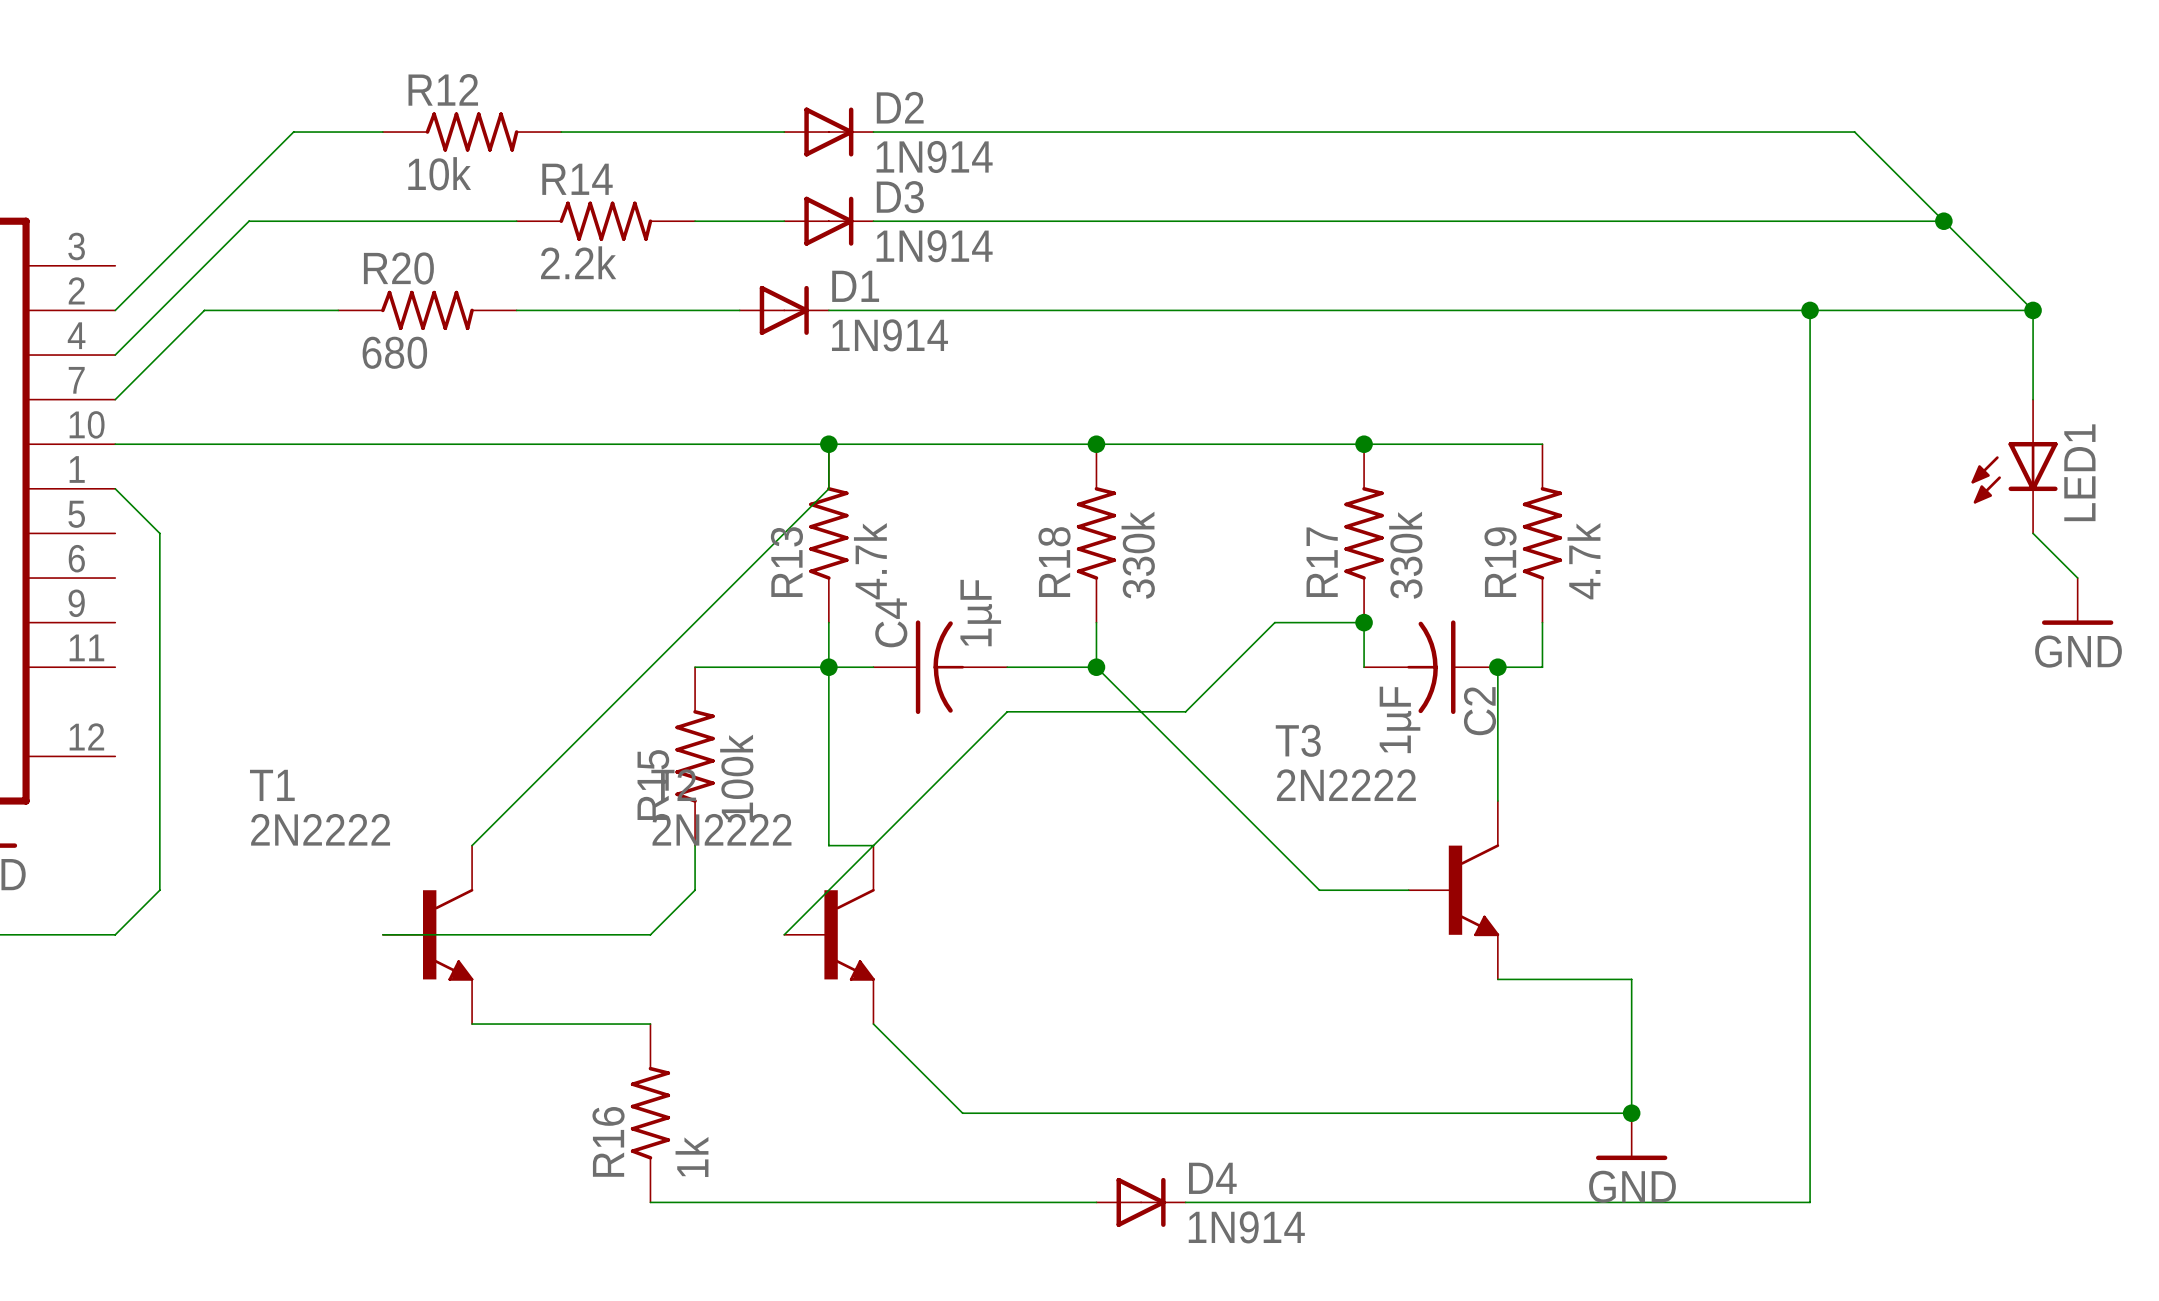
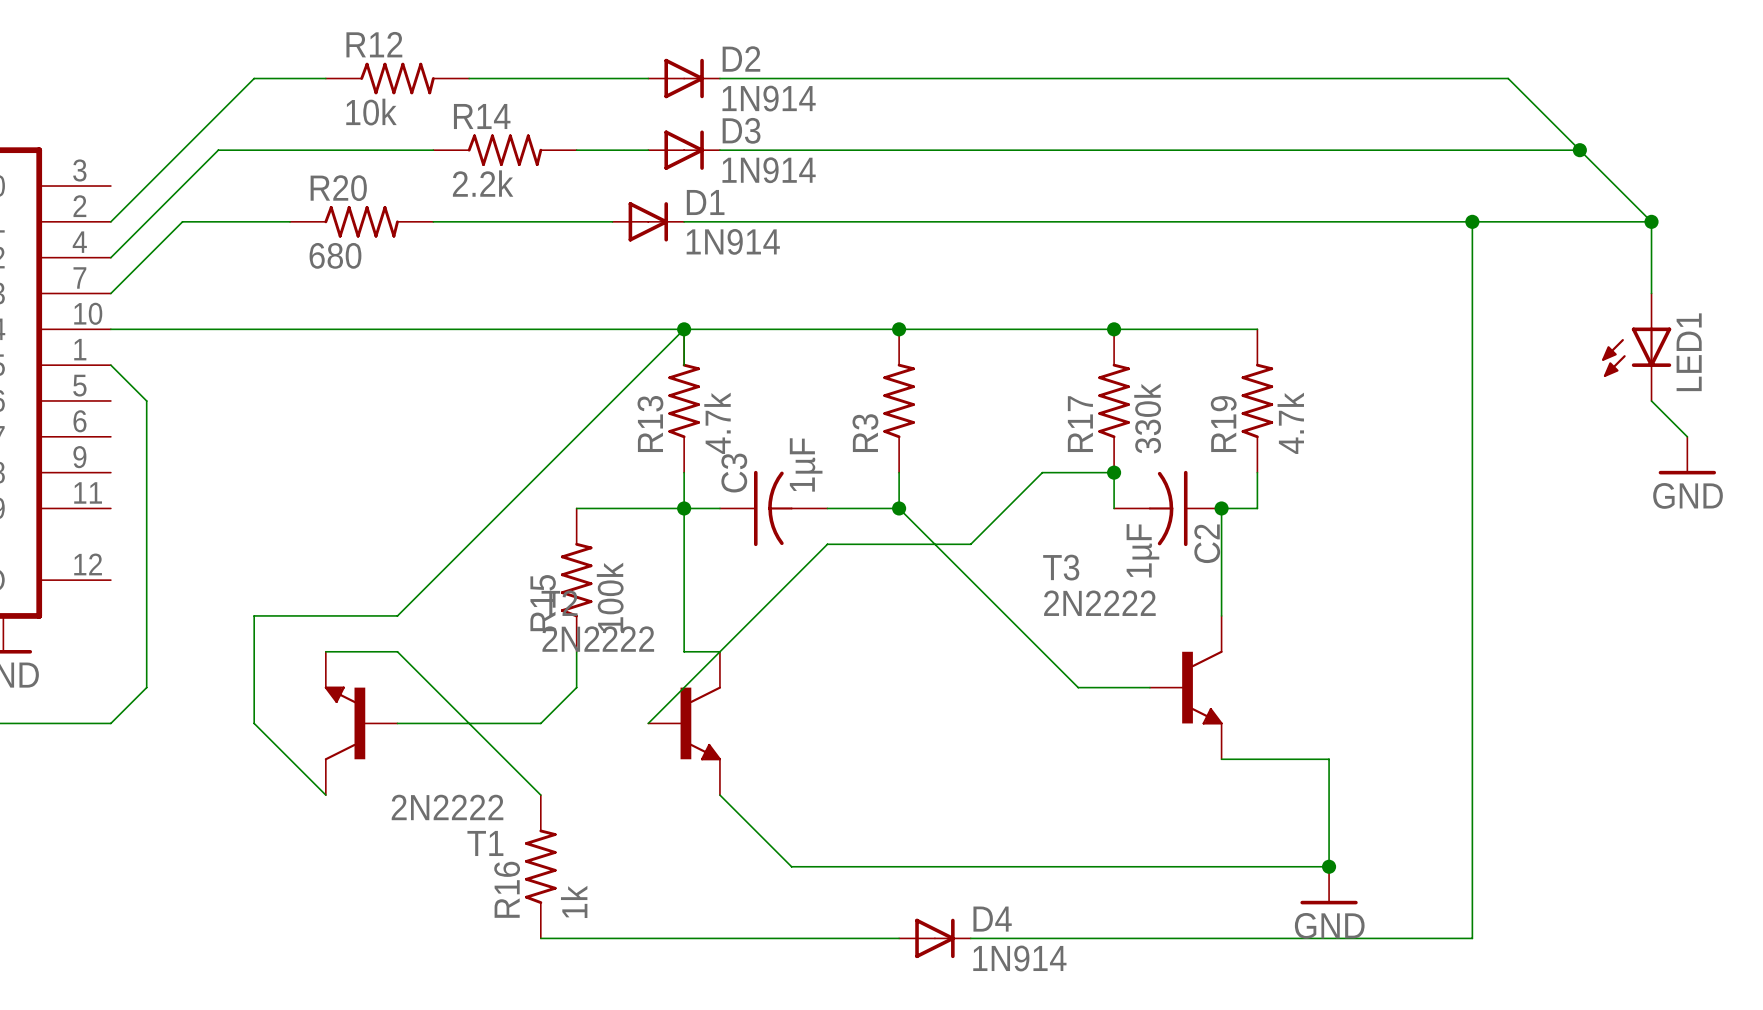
wire: none -> (684, 329) (397, 615) (254, 615) (254, 723) (325, 795)
wire: (828, 488) (472, 845) -> none
R18 value: 330k (1138, 555) -> none
R18 name: R18 (1054, 562) -> R3 (865, 433)
C4 name: C4 (891, 622) -> C3 (734, 473)
T1 rotation: 0° (448, 934) -> 180° (345, 723)
wire: (472, 1024) (650, 1024) -> (325, 651) (397, 651) (540, 795)

